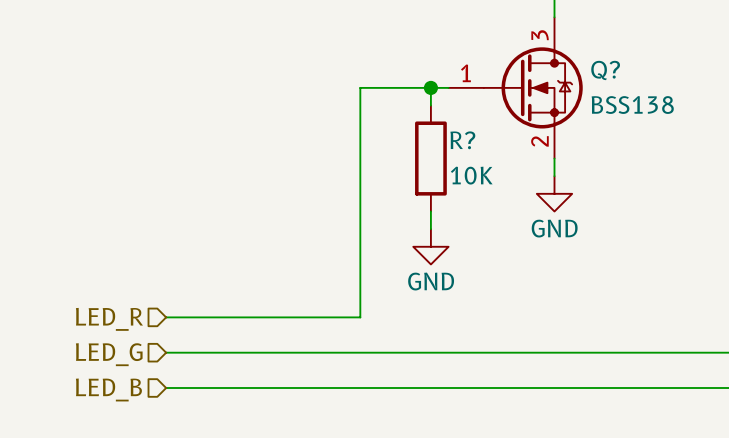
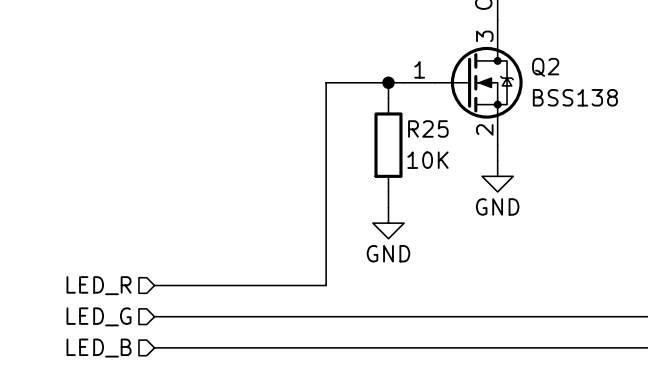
Q? name: Q? (605, 70) -> Q2 (545, 67)
R? name: R? (462, 140) -> R25 (428, 128)

